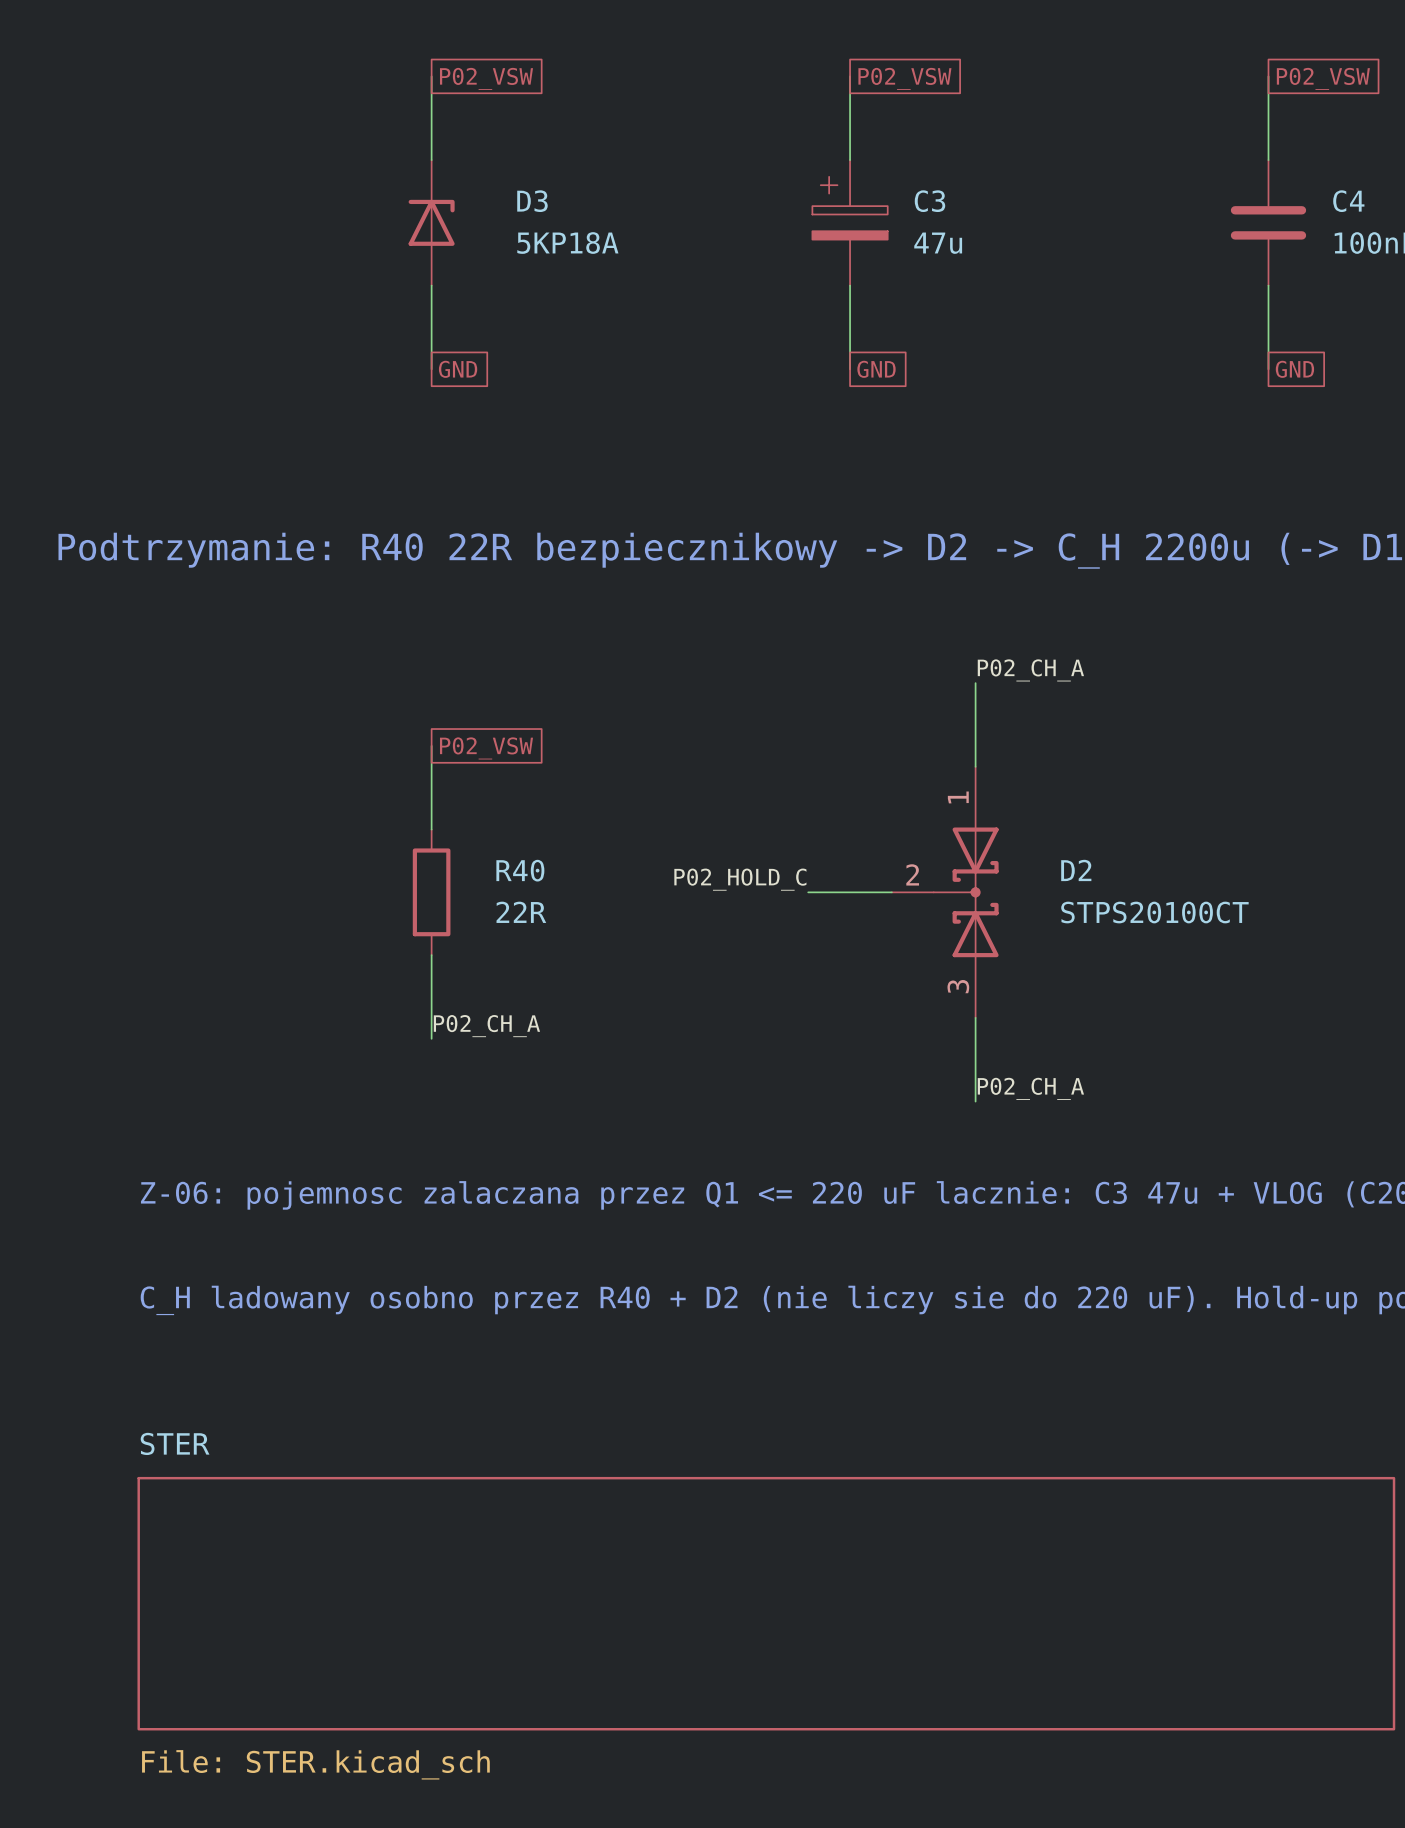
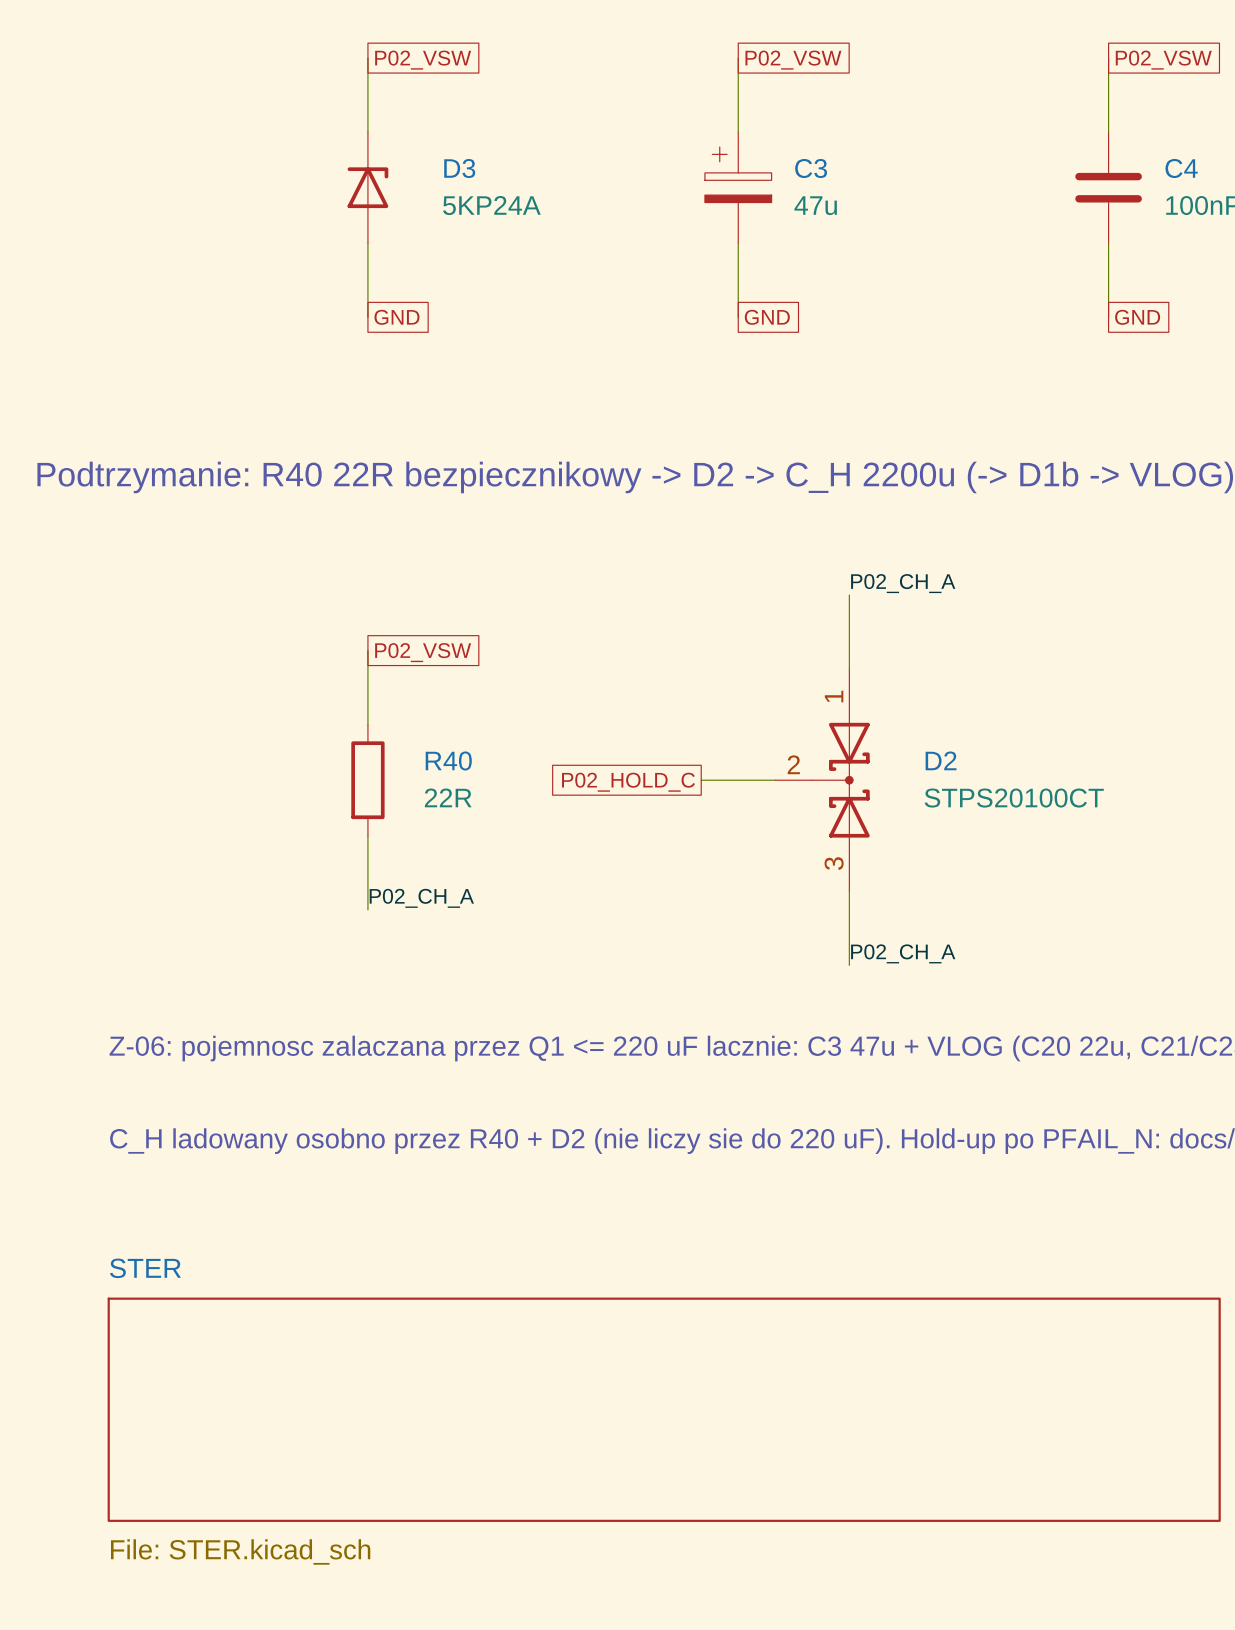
D3 value: 5KP18A (567, 243) -> 5KP24A (491, 205)
label: P02_HOLD_C (740, 879) -> none
global label: none -> P02_HOLD_C (628, 782)

